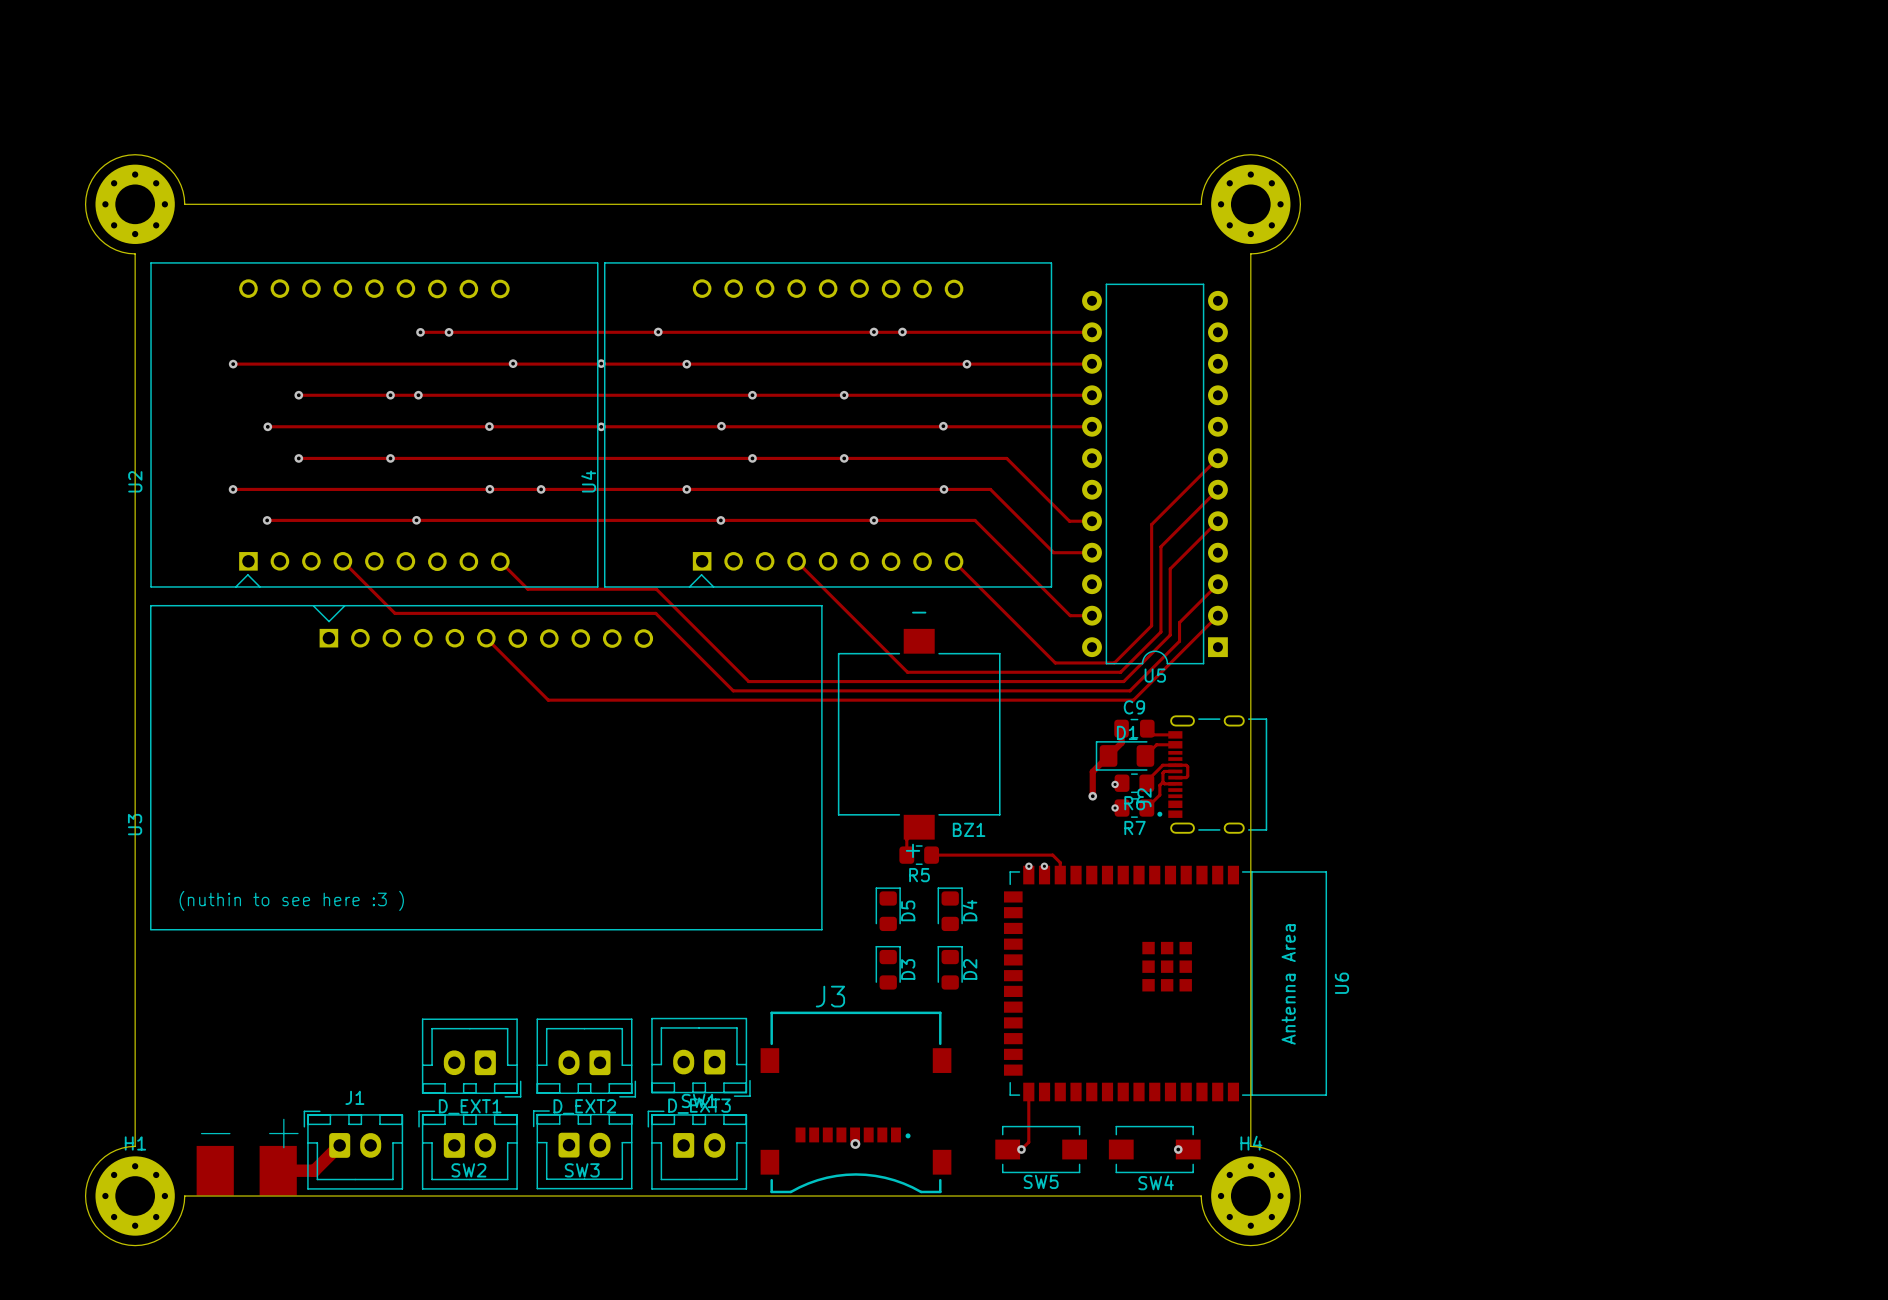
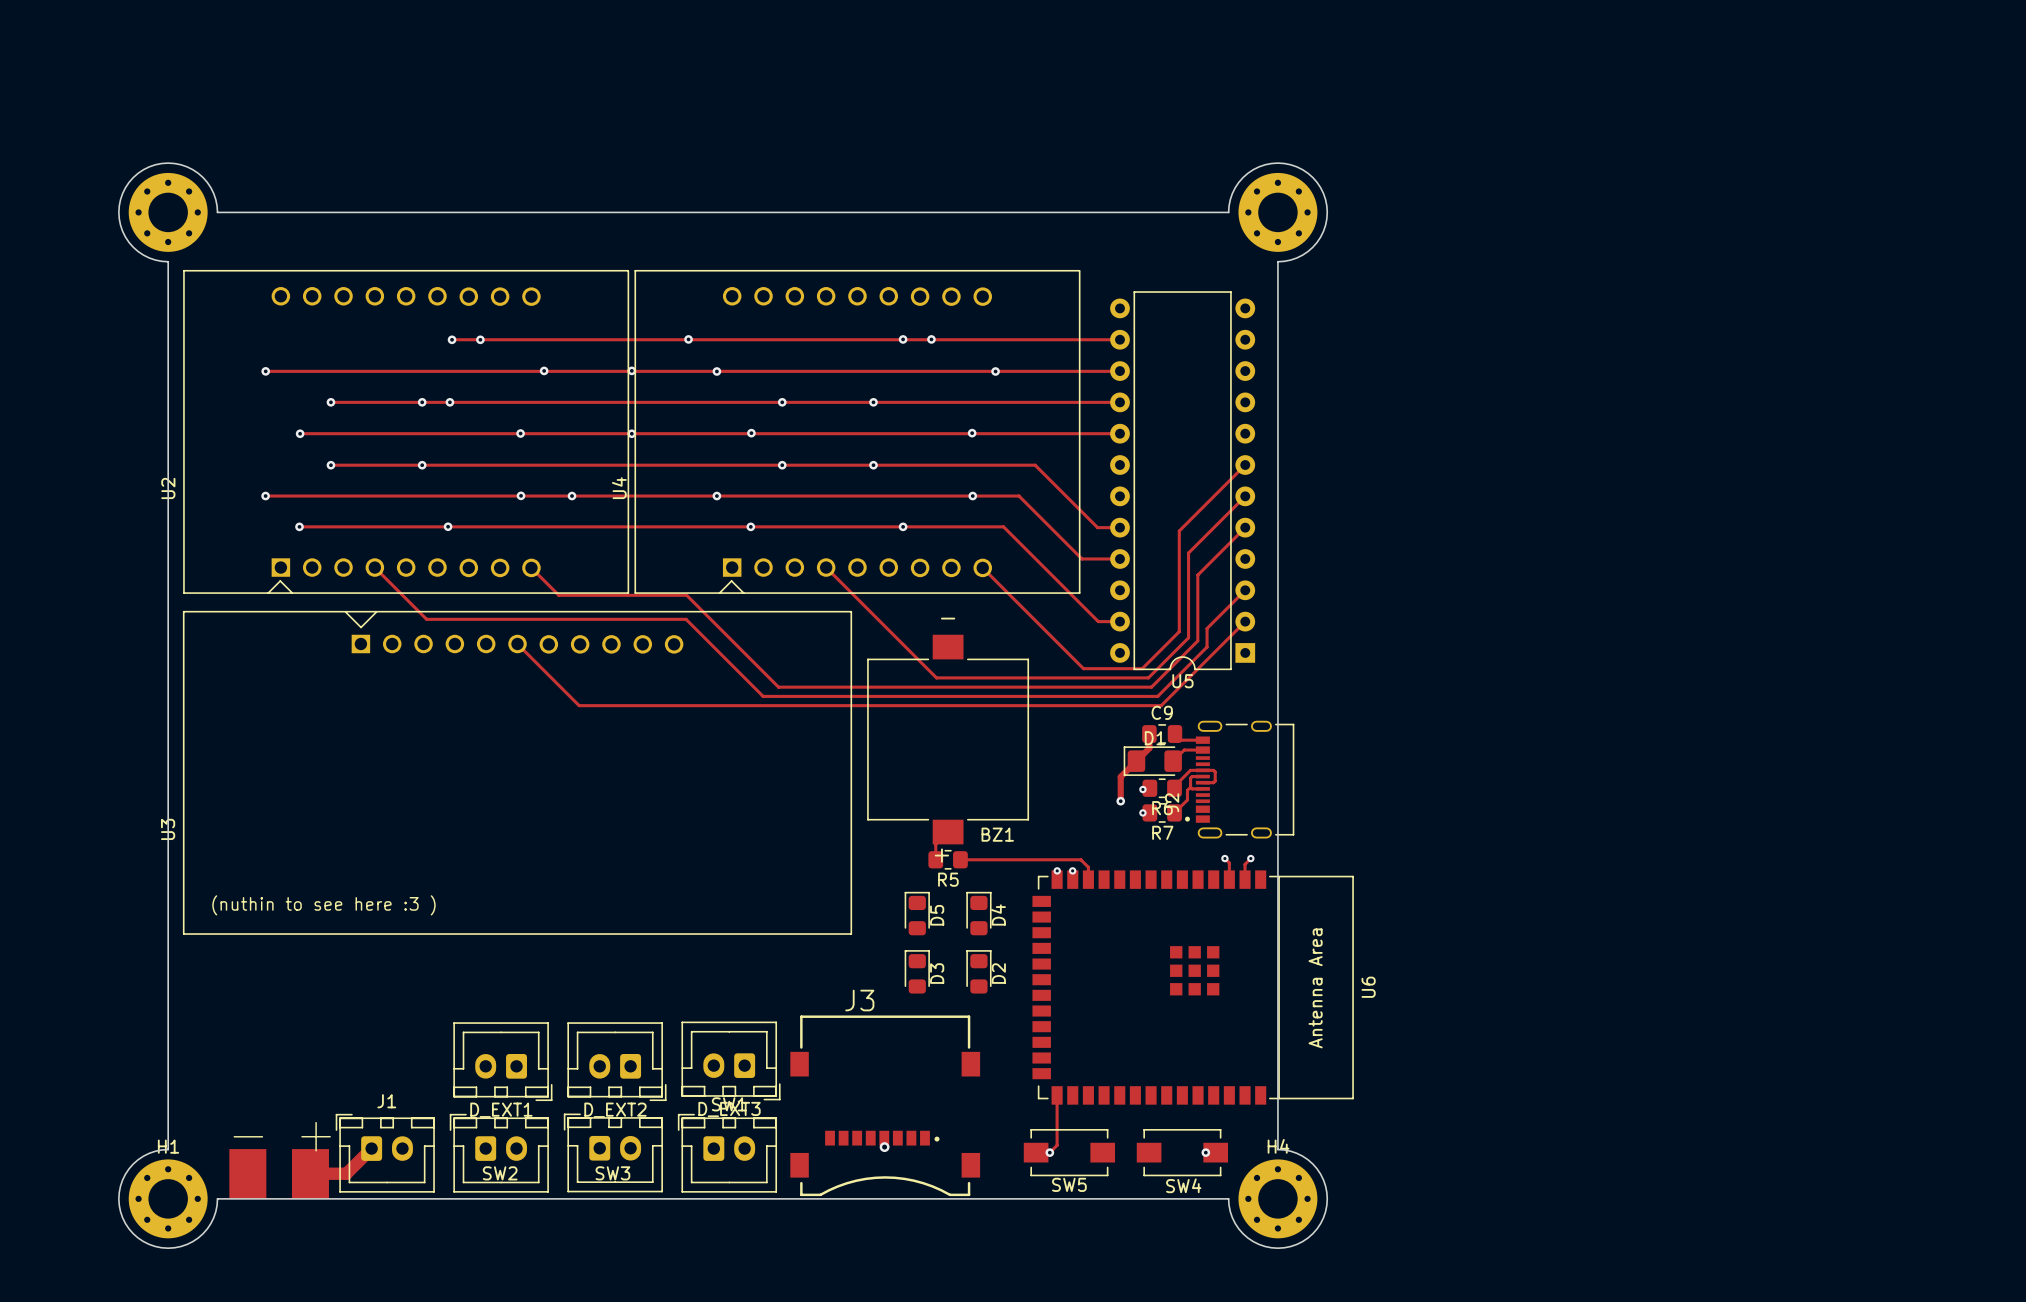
track: none -> (1224, 858) (1229, 862) (1229, 879)
via: none -> (1224, 858)
track: none -> (1250, 858) (1245, 864) (1245, 879)
via: none -> (1250, 858)

